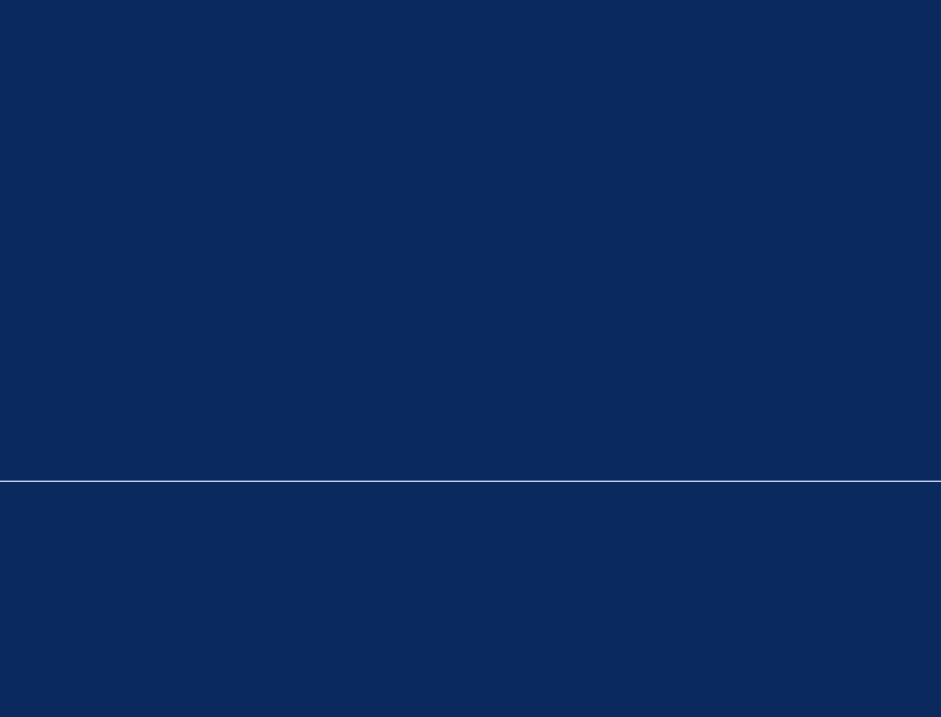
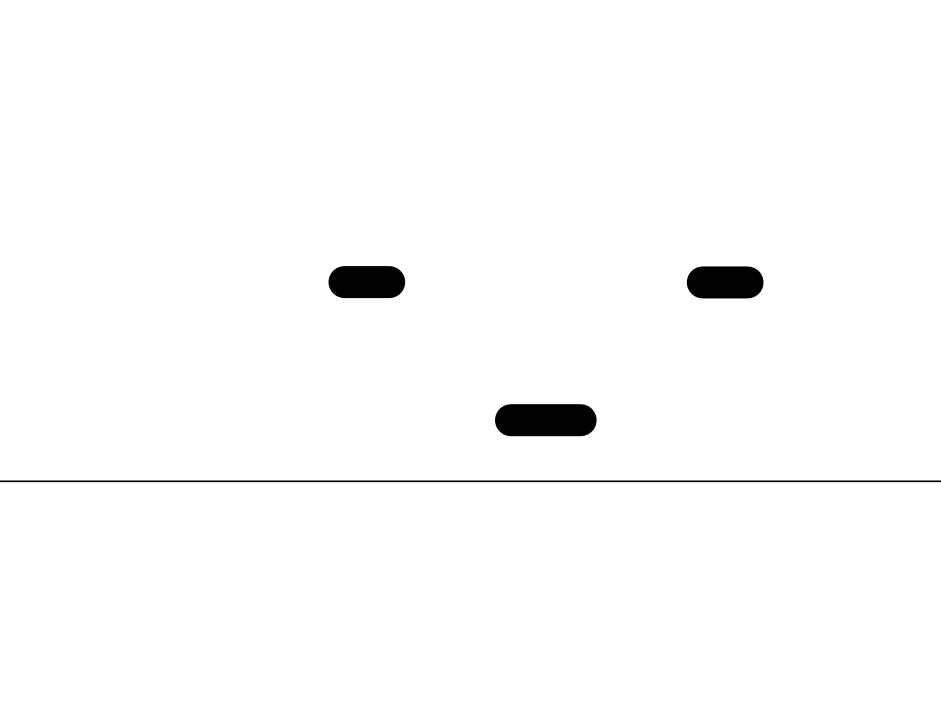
part: none -> (546, 351)

